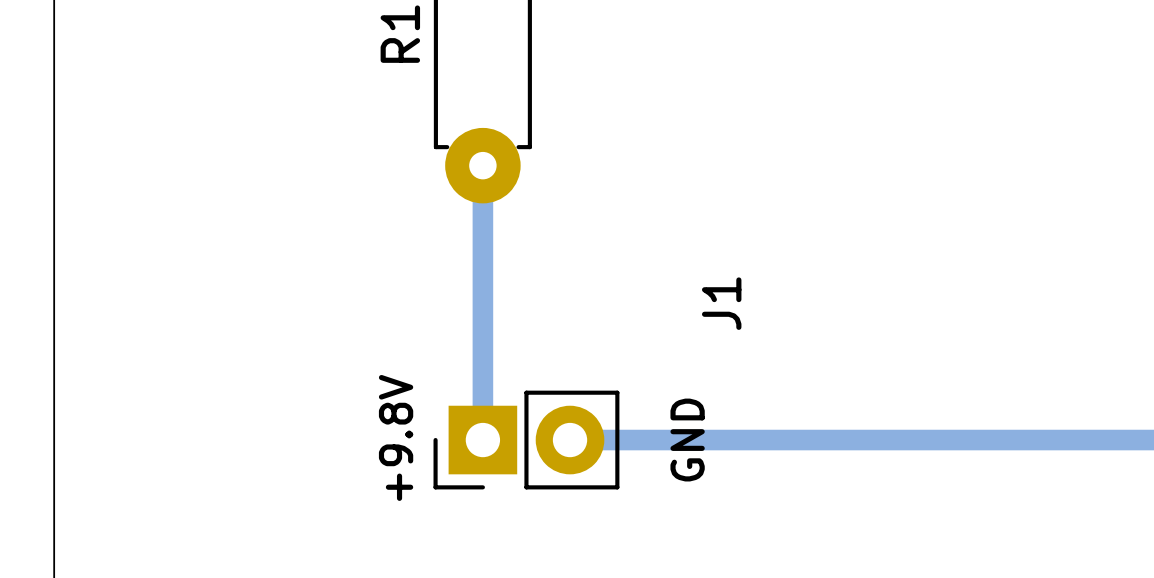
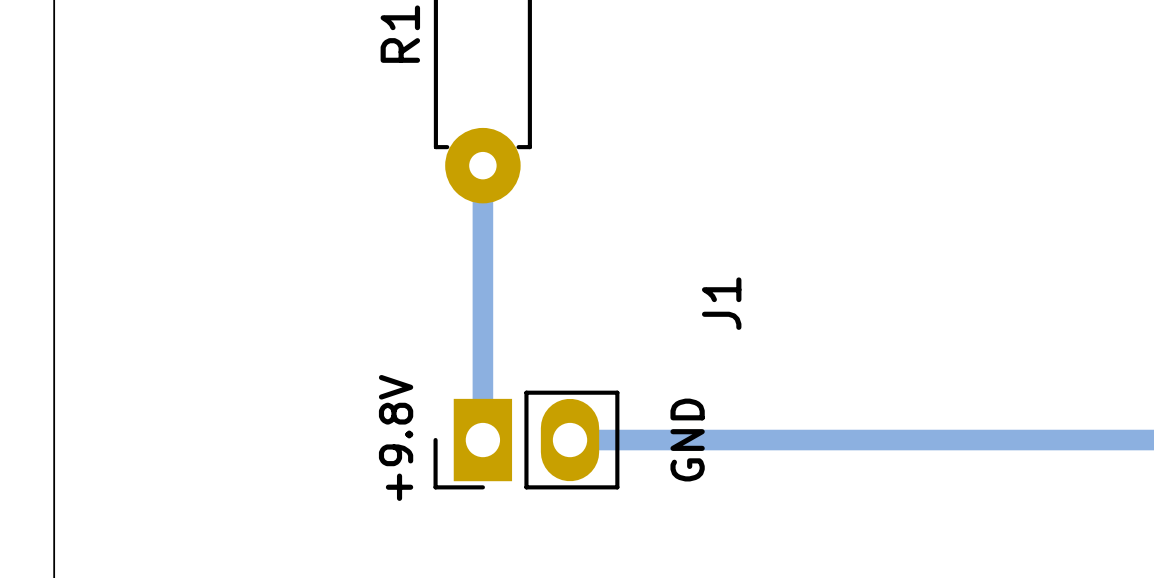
J1 footprint: [433, 390, 620, 490] -> [433, 390, 620, 490]

